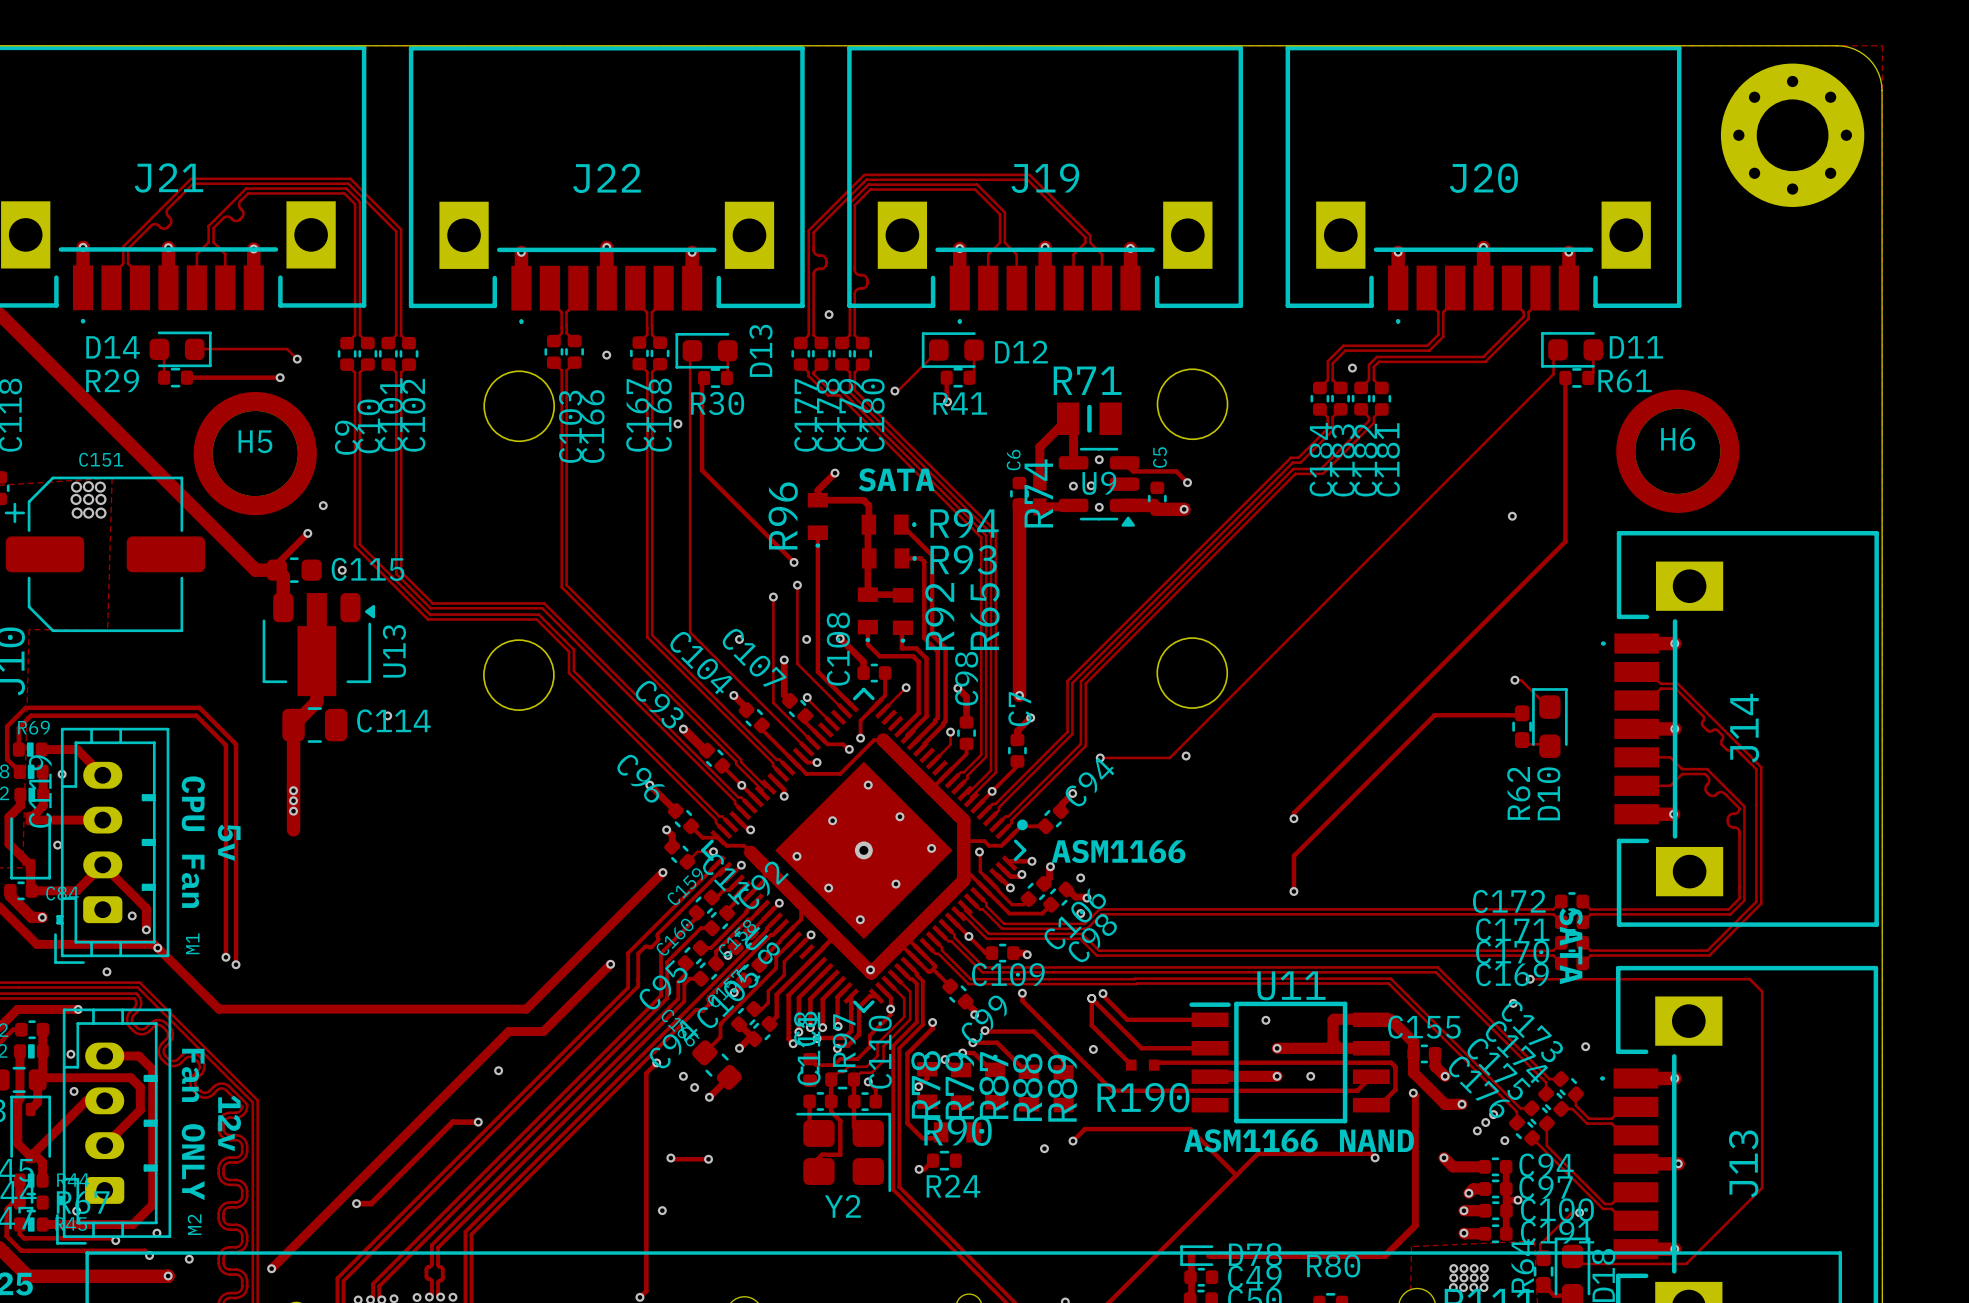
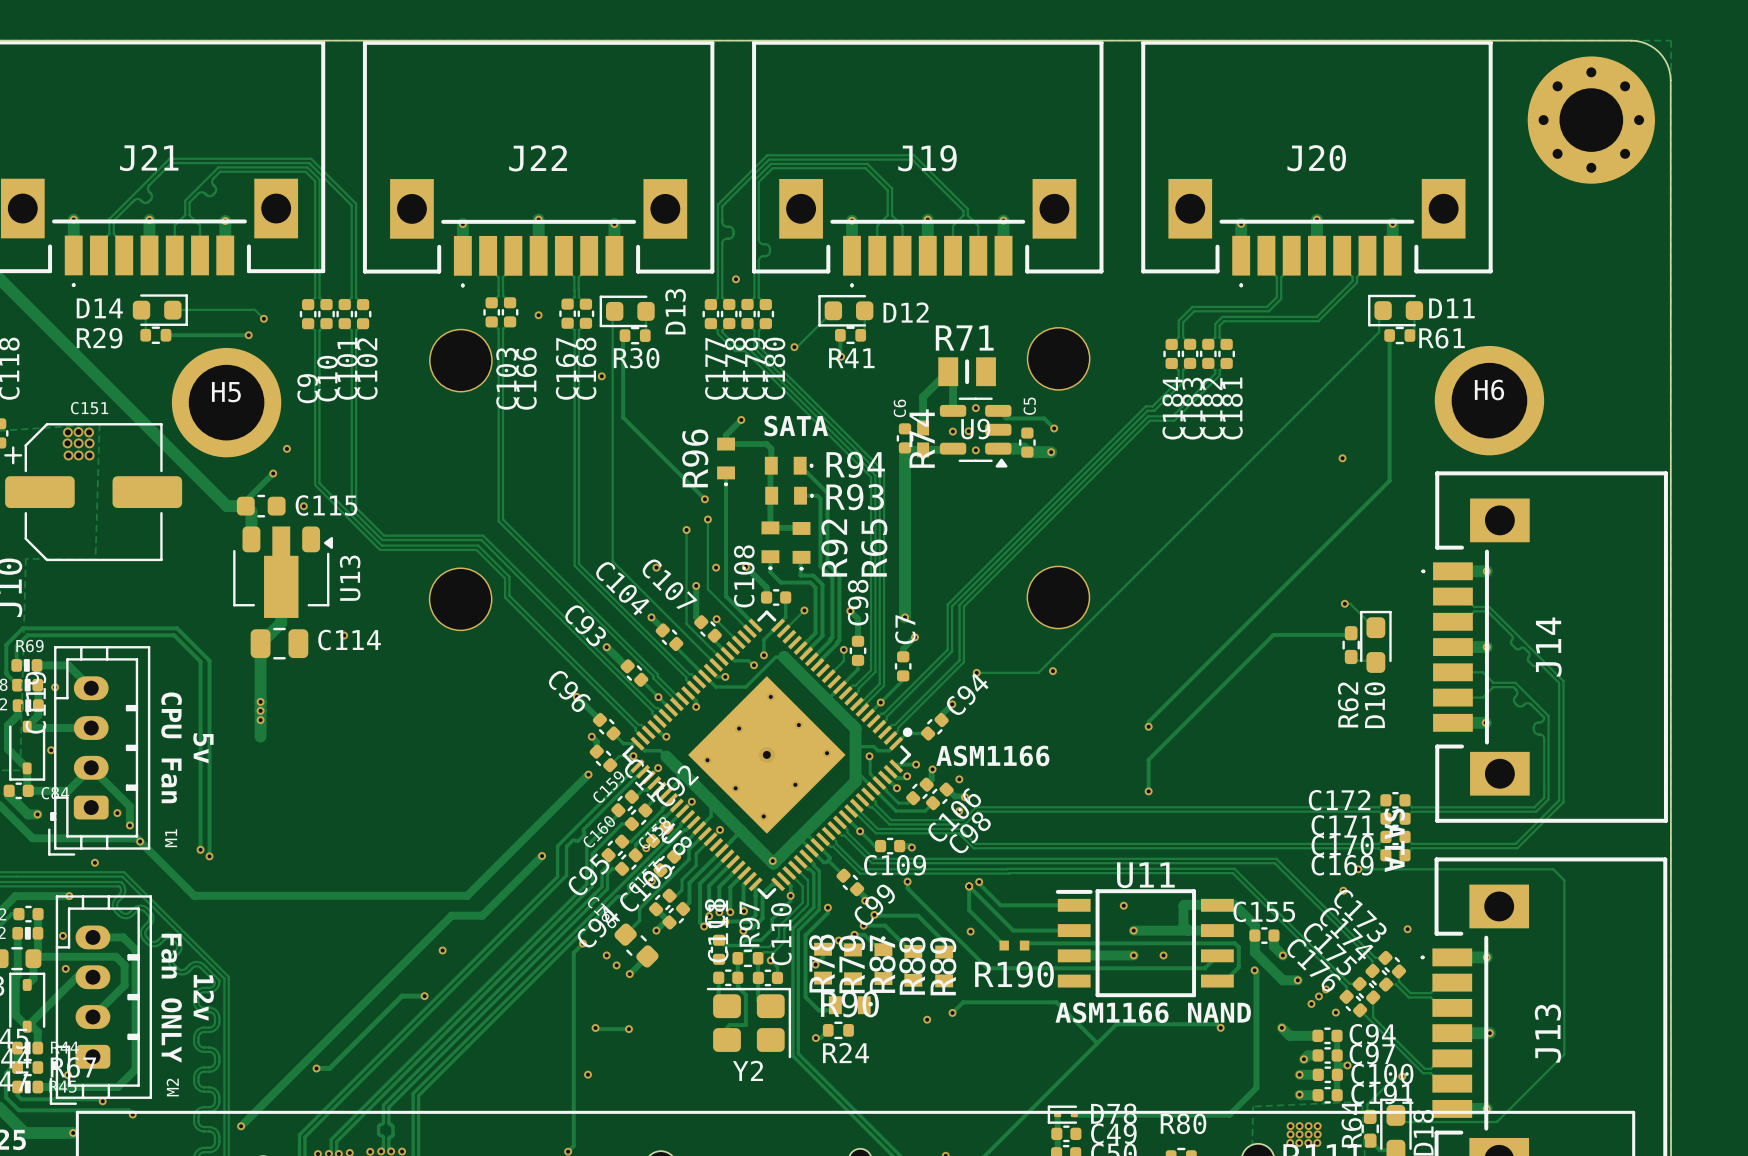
via: (1352, 368) -> none
via: (156, 1233) -> none
via: (189, 1259) -> none
track: (82, 1276) (167, 1276) -> none
via: none -> (73, 1133)
via: (168, 1276) -> none

